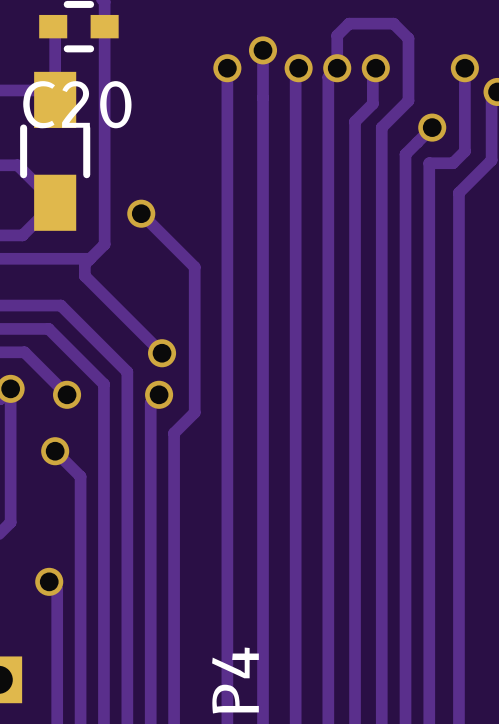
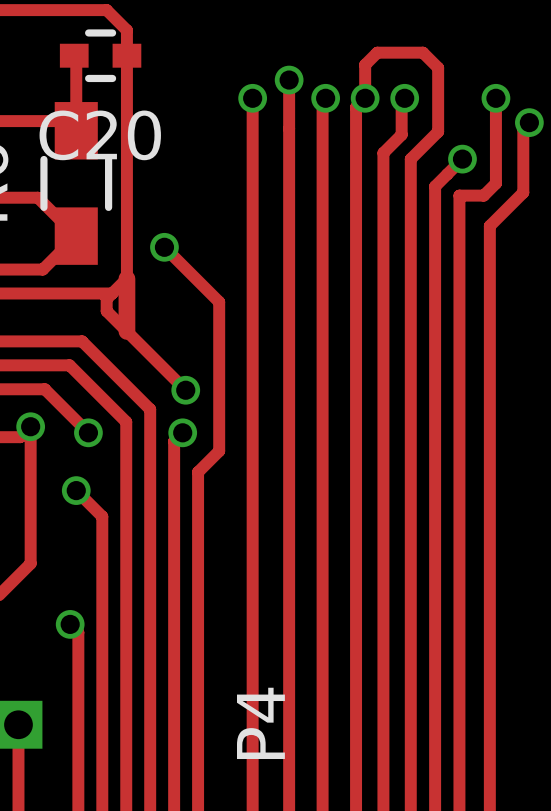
track: none -> (126, 278) (126, 331)

